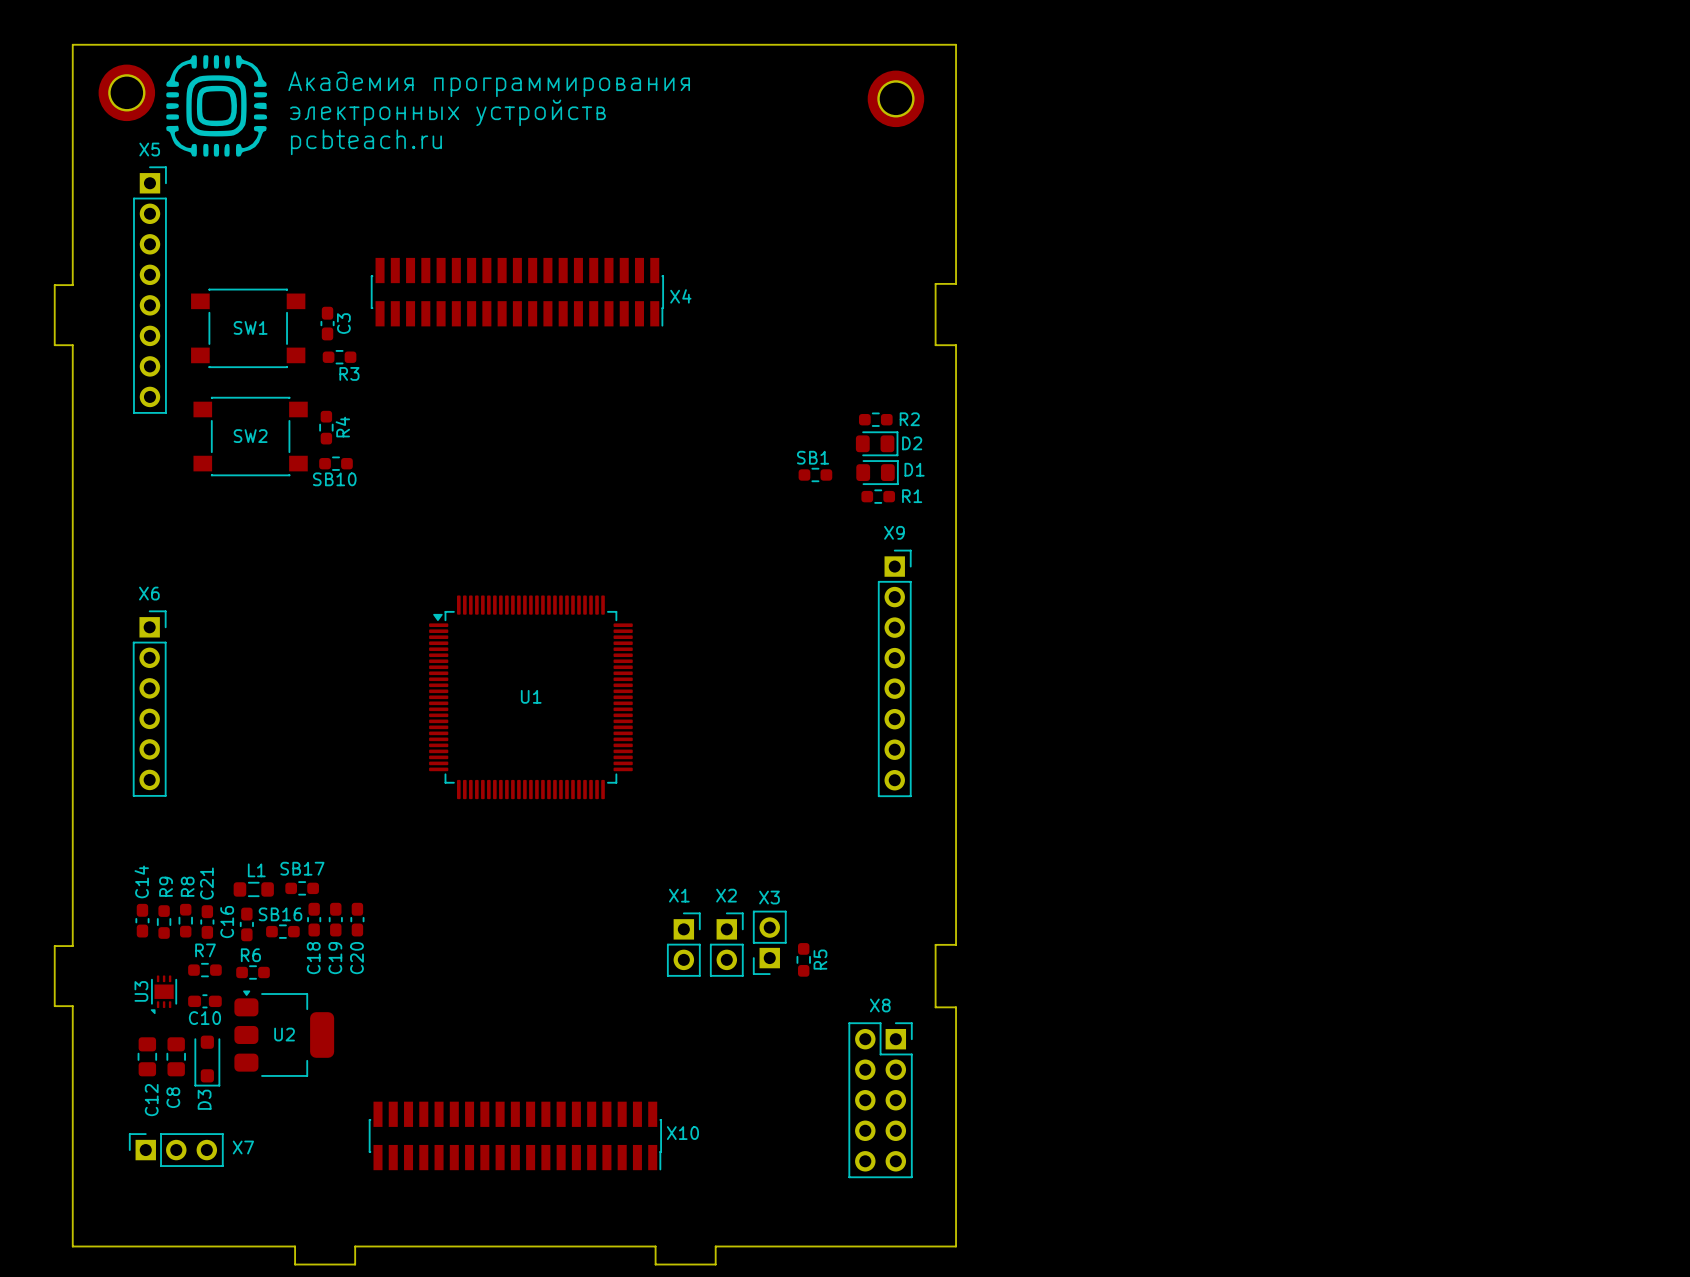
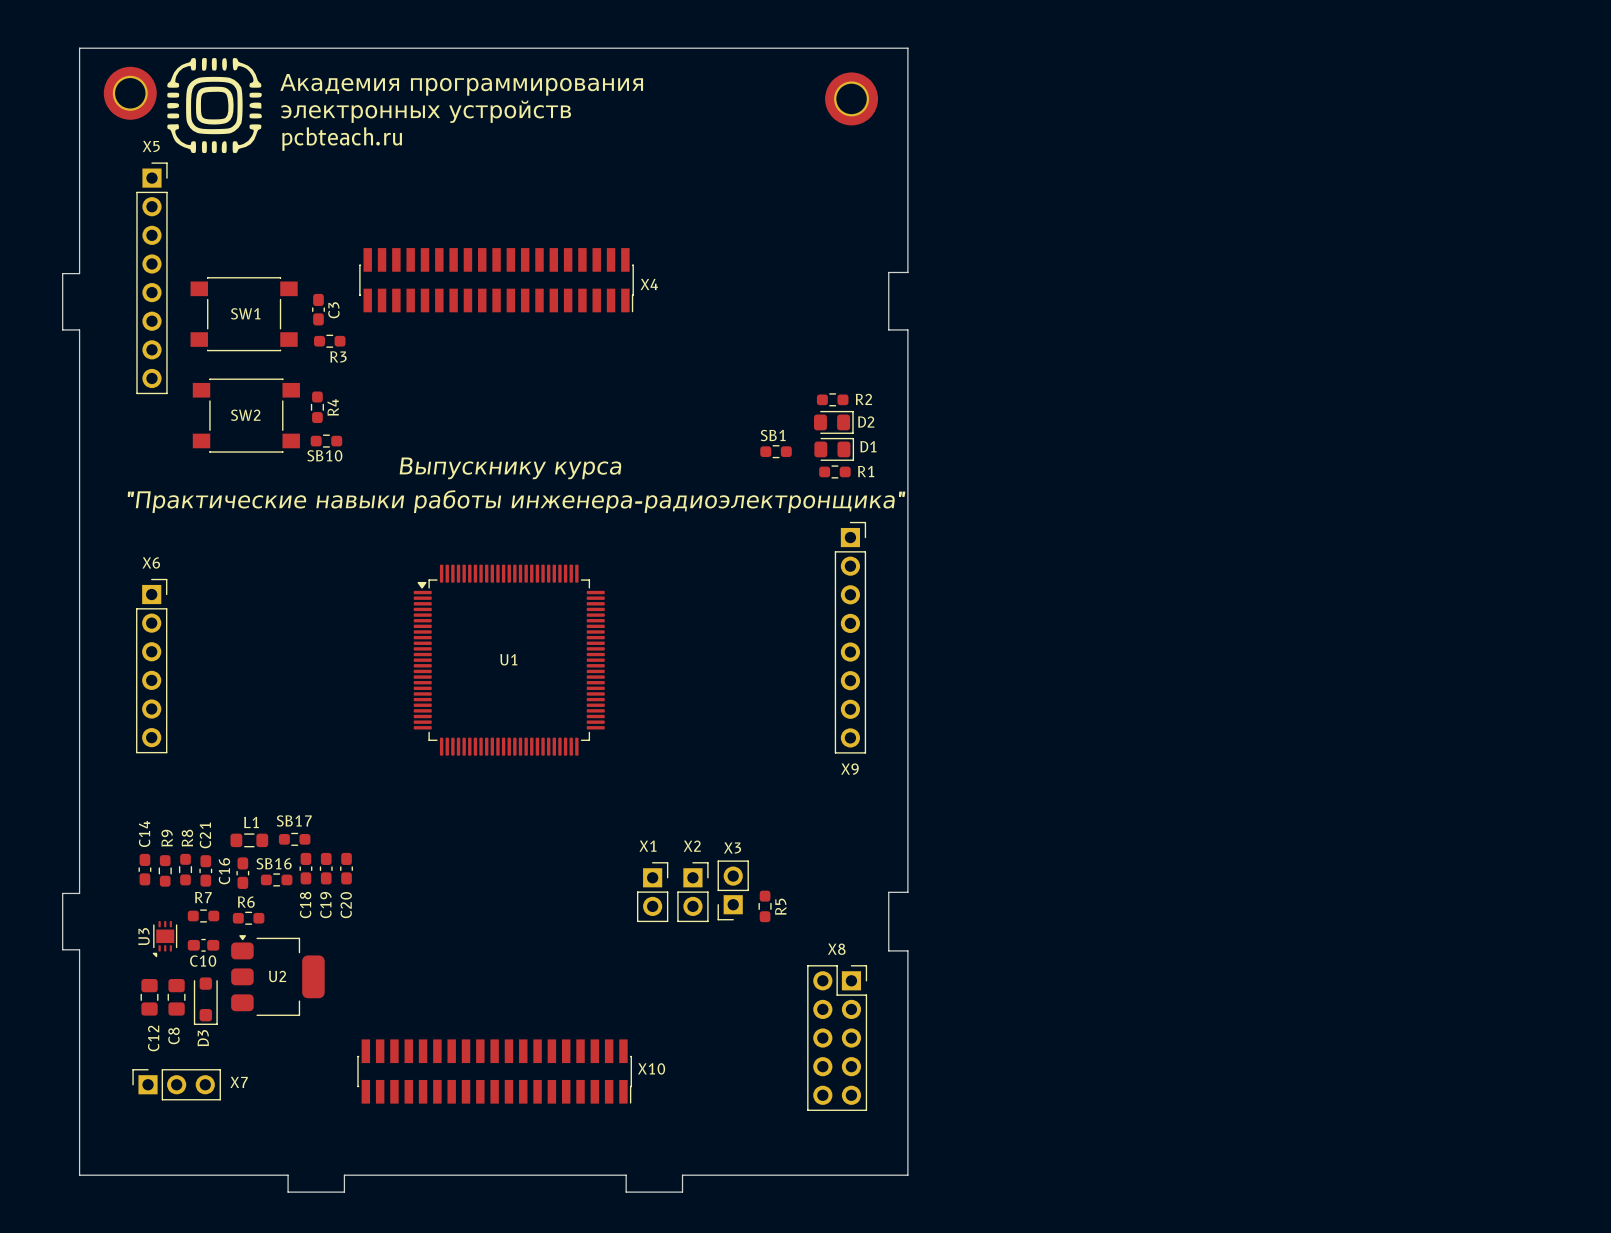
text: none -> Выпускнику курса (510, 468)
text: none -> "Практические навыки работы инженера-радиоэлектронщика" (516, 501)
X9 name position: X9 (894, 532) -> X9 (849, 769)

